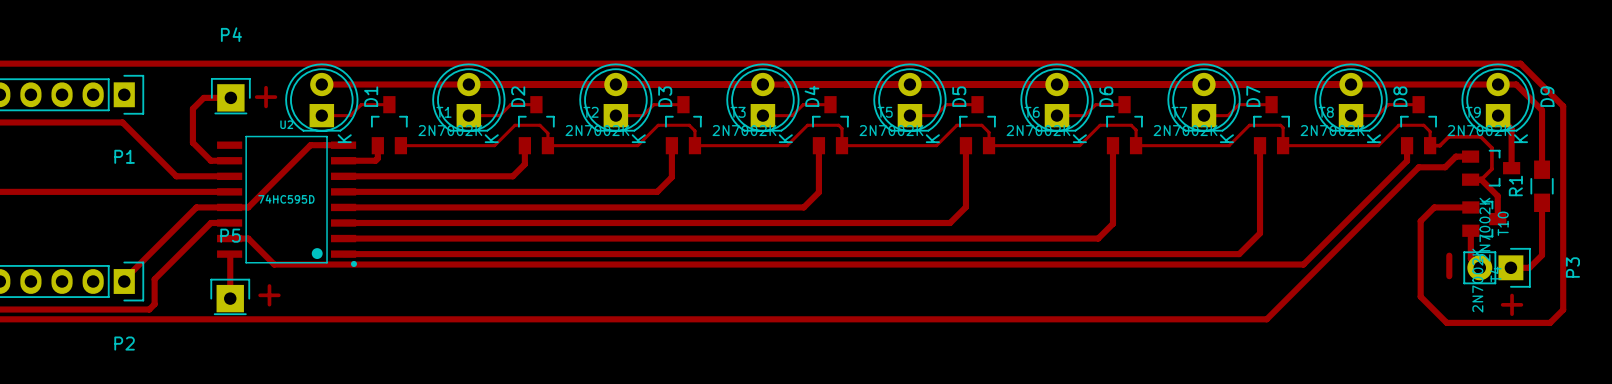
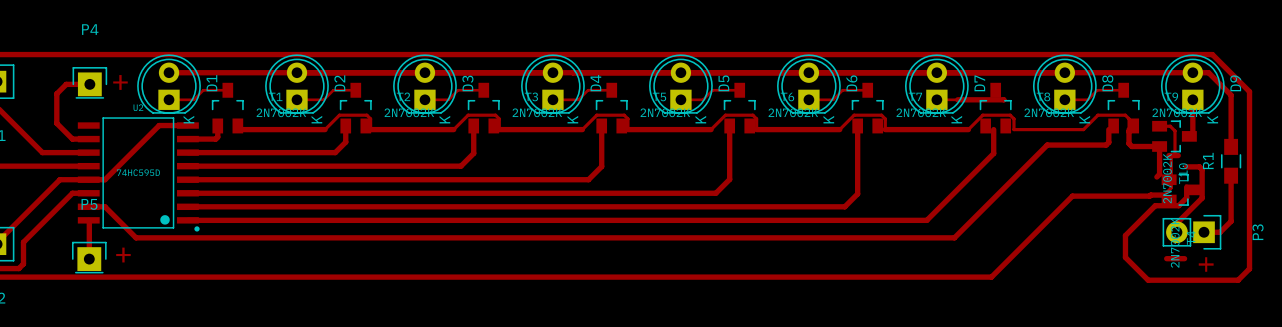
top track: (1271, 104) (1238, 104) (1228, 115) -> (1003, 99) (957, 99)
top track: (1498, 115) (1511, 129) (1511, 168) -> (1192, 99) (1192, 132) (1189, 136)
top track: (400, 145) (494, 145) (515, 125) (539, 125) (547, 133) (547, 145) (637, 145) (658, 125) (689, 125) (694, 130) (694, 145) (787, 145) (807, 125) (838, 125) (841, 128) (841, 145) (936, 145) (956, 125) (981, 125) (989, 132) (989, 145) (1079, 145) (1100, 125) (1131, 125) (1136, 130) (1136, 145) (1229, 145) (1249, 125) (1280, 125) (1283, 127) (1283, 145) (1378, 145) (1398, 125) (1423, 125) (1430, 131) (1430, 145) (1439, 145) (1448, 136) (1480, 136) (1491, 147) (1491, 169) (1481, 179) (1497, 196) (1497, 219) -> none
top track: (1260, 145) (1260, 233) (1239, 254) (1192, 254) -> (993, 129) (993, 153) (926, 220)
top track: (1407, 145) (1407, 160) (1303, 264) (274, 264) -> (1108, 129) (1108, 142) (1106, 145) (1047, 145) (954, 237) (136, 237) (127, 229)
top track: none -> (241, 129) (325, 129) (339, 115) (366, 115) (370, 118) (370, 129) (453, 129) (468, 115) (495, 115) (499, 118) (499, 129) (582, 129) (596, 115) (624, 115) (627, 118) (627, 129) (711, 129) (725, 115) (752, 115) (756, 118) (756, 129) (839, 129) (854, 115) (881, 115) (885, 118) (885, 129) (968, 129) (982, 115) (1010, 115) (1013, 118) (1013, 129) (1083, 129) (1097, 115) (1125, 115) (1129, 118) (1129, 131)
T10 footprint: [1462, 149, 1521, 187] -> [1152, 120, 1197, 153]
top track: none -> (1129, 131) (1129, 143) (1131, 146) (1159, 146) (1159, 174) (1156, 177)
top track: (1470, 156) (1455, 156) (1445, 167) (1418, 167) (1359, 226) -> (1159, 126) (1170, 126) (1174, 130) (1174, 153) (1171, 157) (1171, 187) (1163, 196) (1072, 196)
top track: (1470, 207) (1434, 207) (1420, 221) (1420, 271) -> (1186, 187) (1186, 197) (1178, 205) (1155, 205) (1125, 235)
top track: (1470, 230) (1470, 258) (1479, 267) -> (1186, 166) (1199, 166) (1202, 169) (1202, 198) (1176, 223) (1176, 232)
top track: (1449, 255) (1449, 276) -> none
top track: none -> (1166, 258) (1184, 258)

